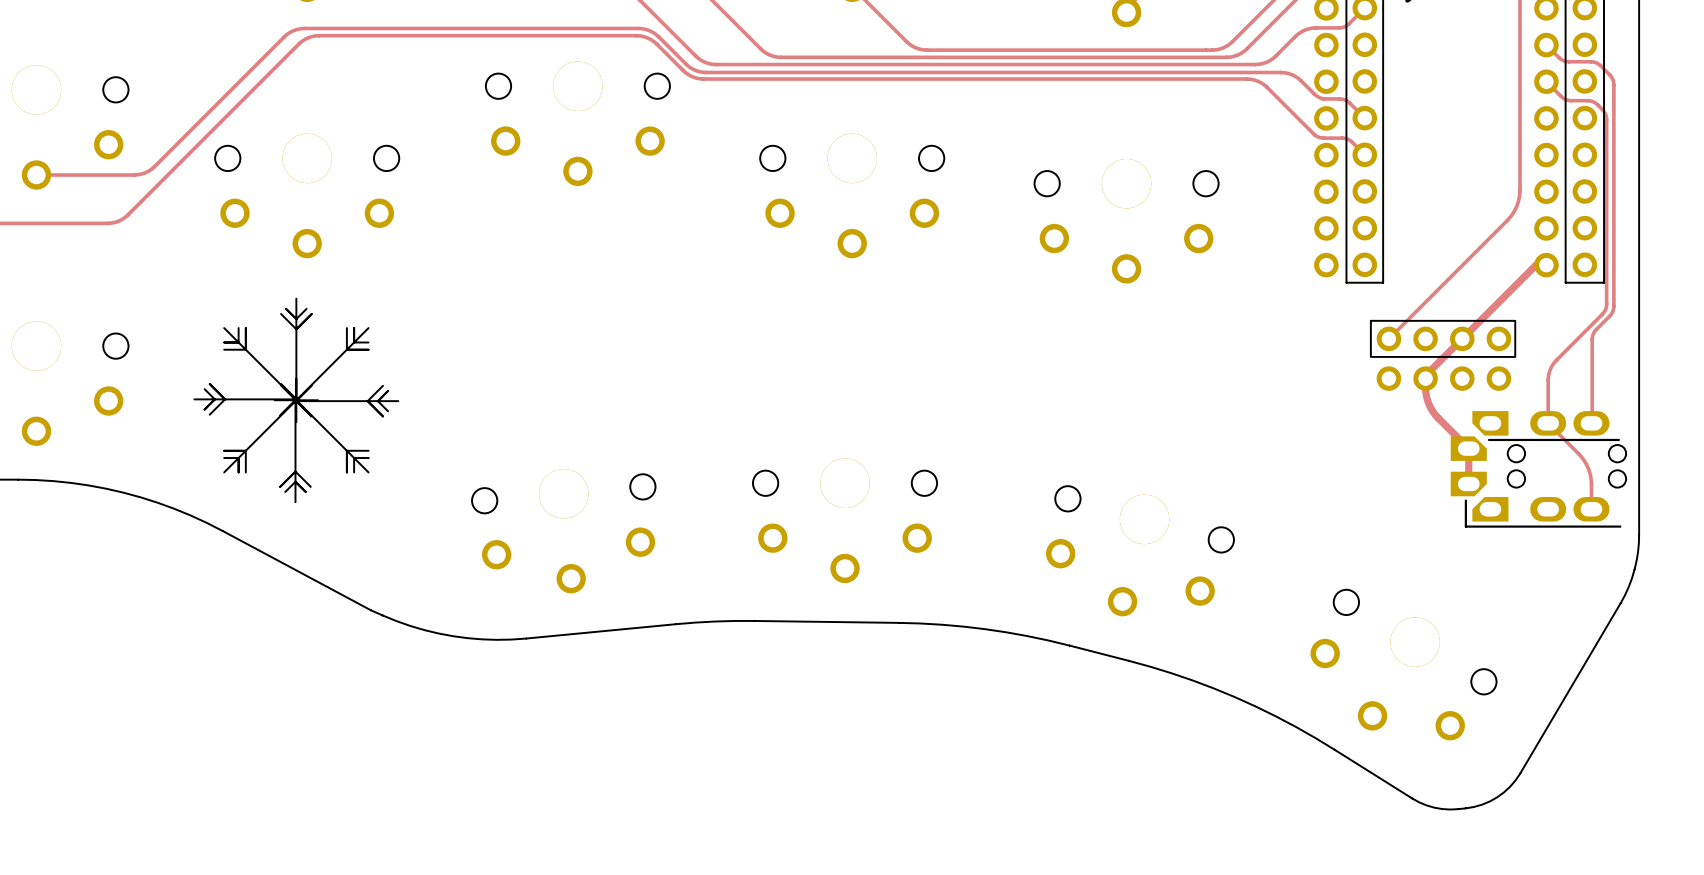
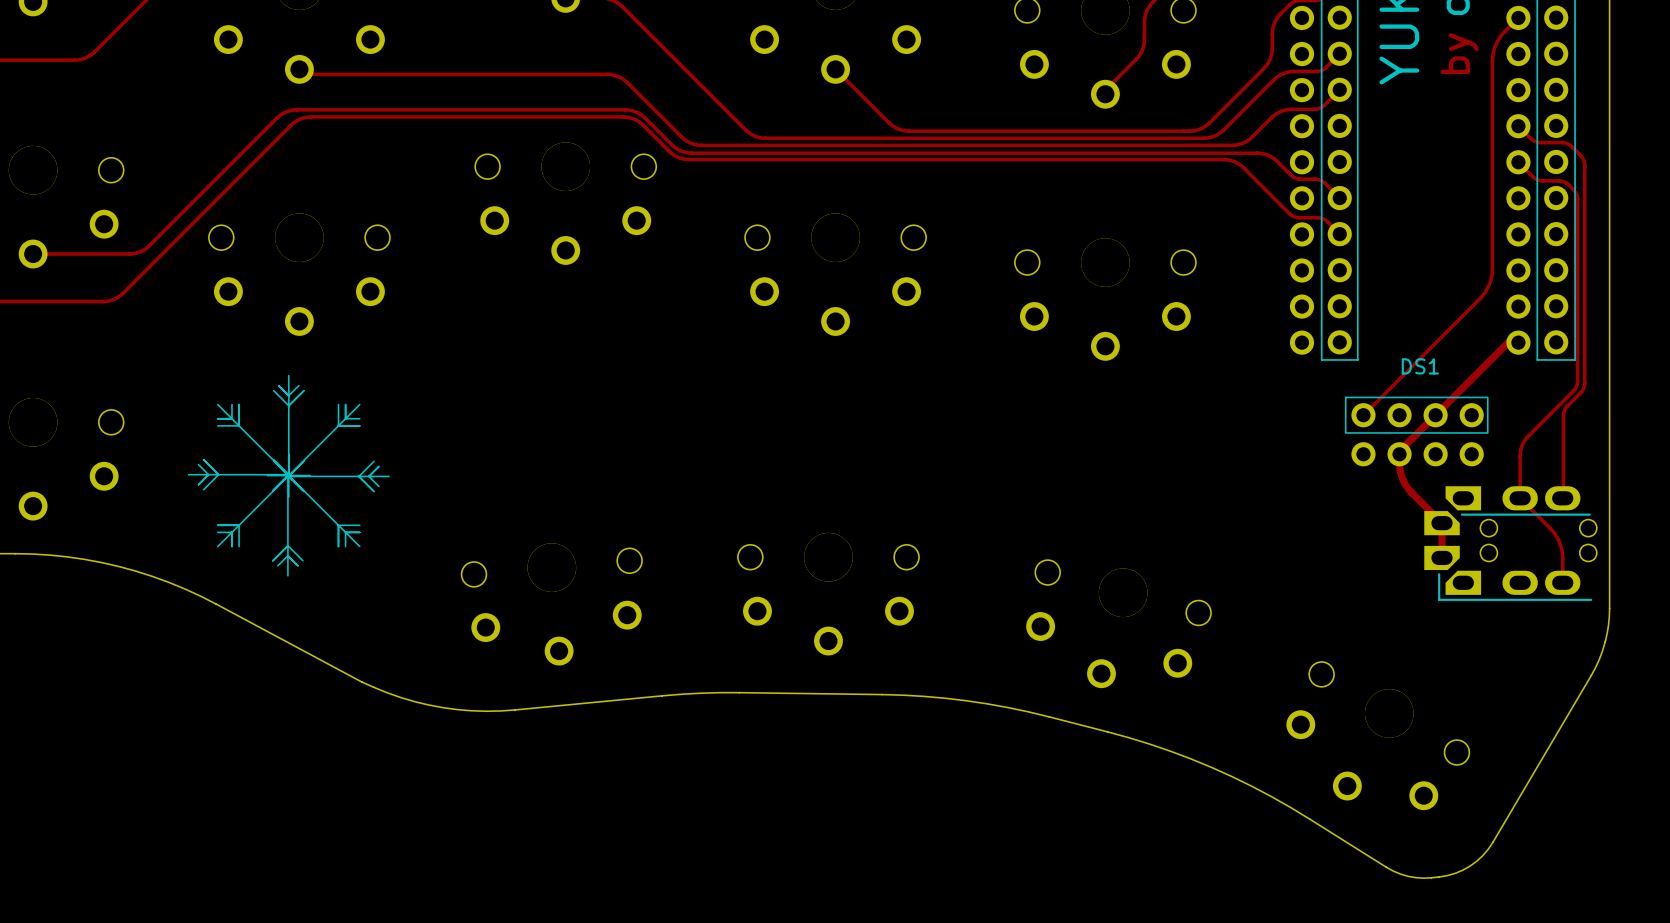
text: none -> DS1 (1420, 366)

